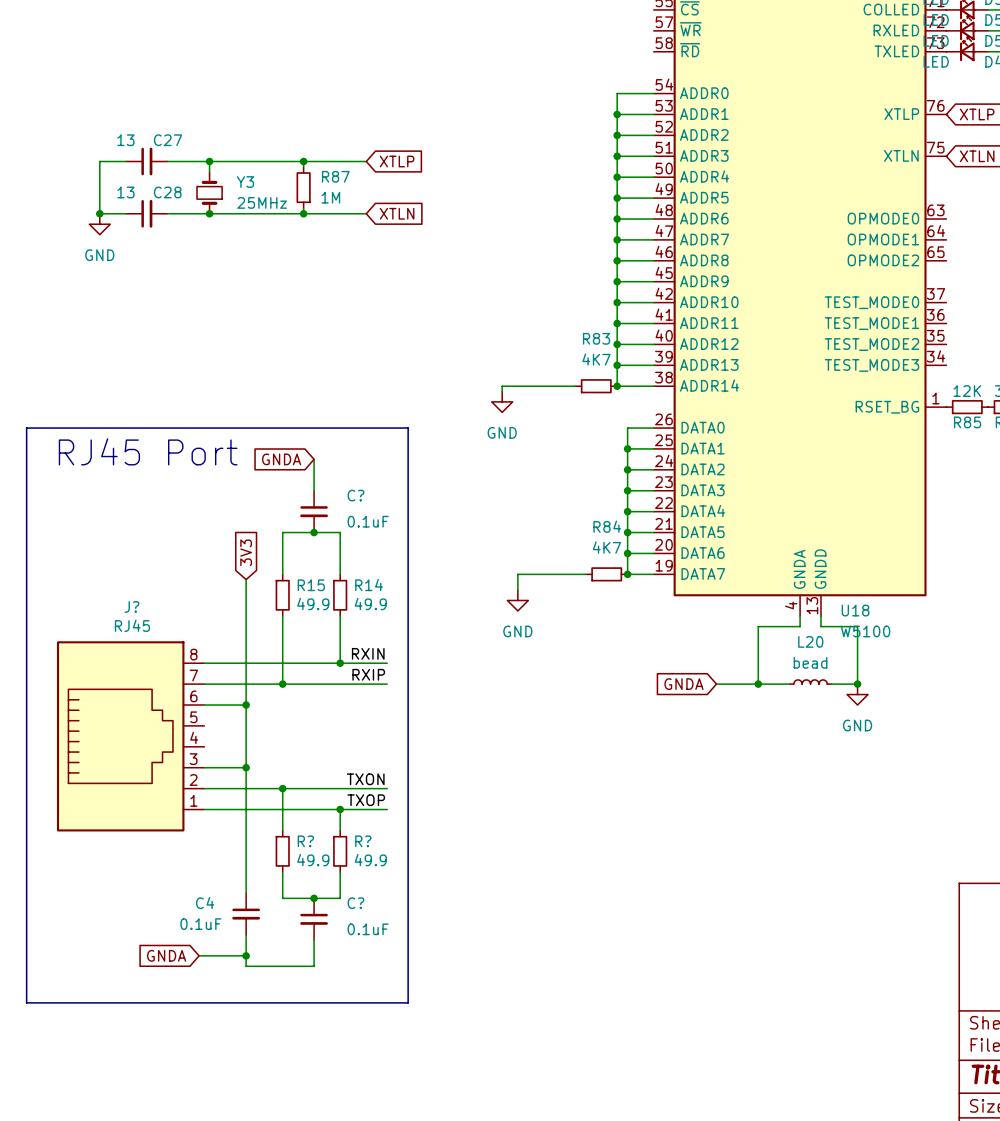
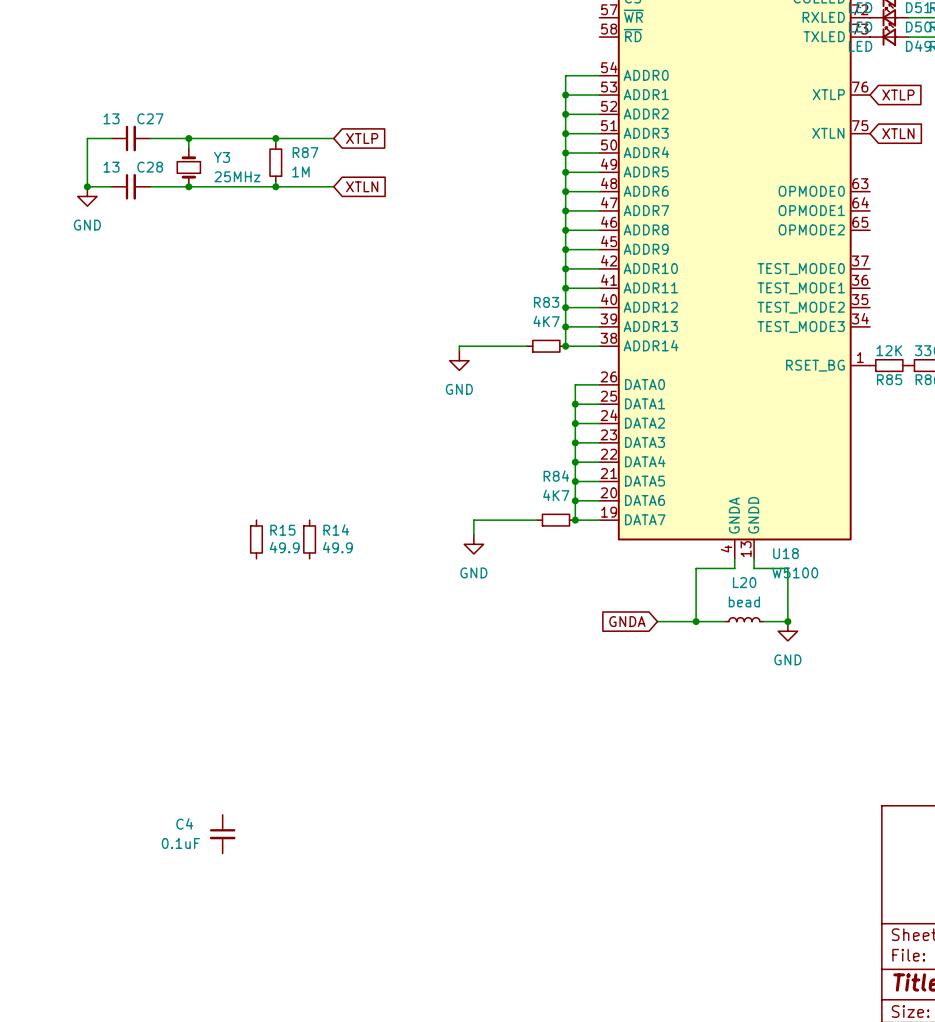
line: (26, 428) (26, 1002) (408, 1002) (408, 428) (26, 428) -> none
text: RJ45 Port (148, 451) -> none
global label: GNDA (281, 459) -> none
wire: (314, 459) (314, 490) -> none
C?: 0.1uF (314, 511) -> none
junction: (314, 532) -> none
global label: 3V3 (246, 552) -> none
wire: (282, 574) (282, 532) (340, 532) (340, 574) -> none
wire: (246, 579) (246, 893) -> none
wire: (282, 616) (282, 684) -> none
wire: (340, 616) (340, 663) -> none
label: RXIN (368, 653) -> none
wire: (204, 663) (387, 663) -> none
junction: (340, 663) -> none
label: RXIP (368, 674) -> none
wire: (204, 684) (387, 684) -> none
junction: (282, 684) -> none
wire: (204, 705) (246, 705) -> none
junction: (246, 705) -> none
J?: RJ45 (130, 736) -> none
wire: (204, 767) (246, 767) -> none
junction: (246, 767) -> none
label: TXON (365, 779) -> none
wire: (204, 788) (387, 788) -> none
wire: (282, 788) (282, 830) -> none
junction: (282, 788) -> none
label: TXOP (366, 800) -> none
wire: (204, 809) (387, 809) -> none
wire: (340, 809) (340, 830) -> none
junction: (340, 809) -> none
R?: 49.9 (282, 851) -> none
R?: 49.9 (340, 851) -> none
wire: (282, 872) (282, 898) (340, 898) (340, 872) -> none
junction: (314, 898) -> none
C?: 0.1uF (314, 919) -> none
wire: (246, 934) (246, 966) (314, 966) (314, 940) -> none
global label: GNDA (166, 955) -> none
wire: (199, 955) (246, 955) -> none
junction: (246, 955) -> none

